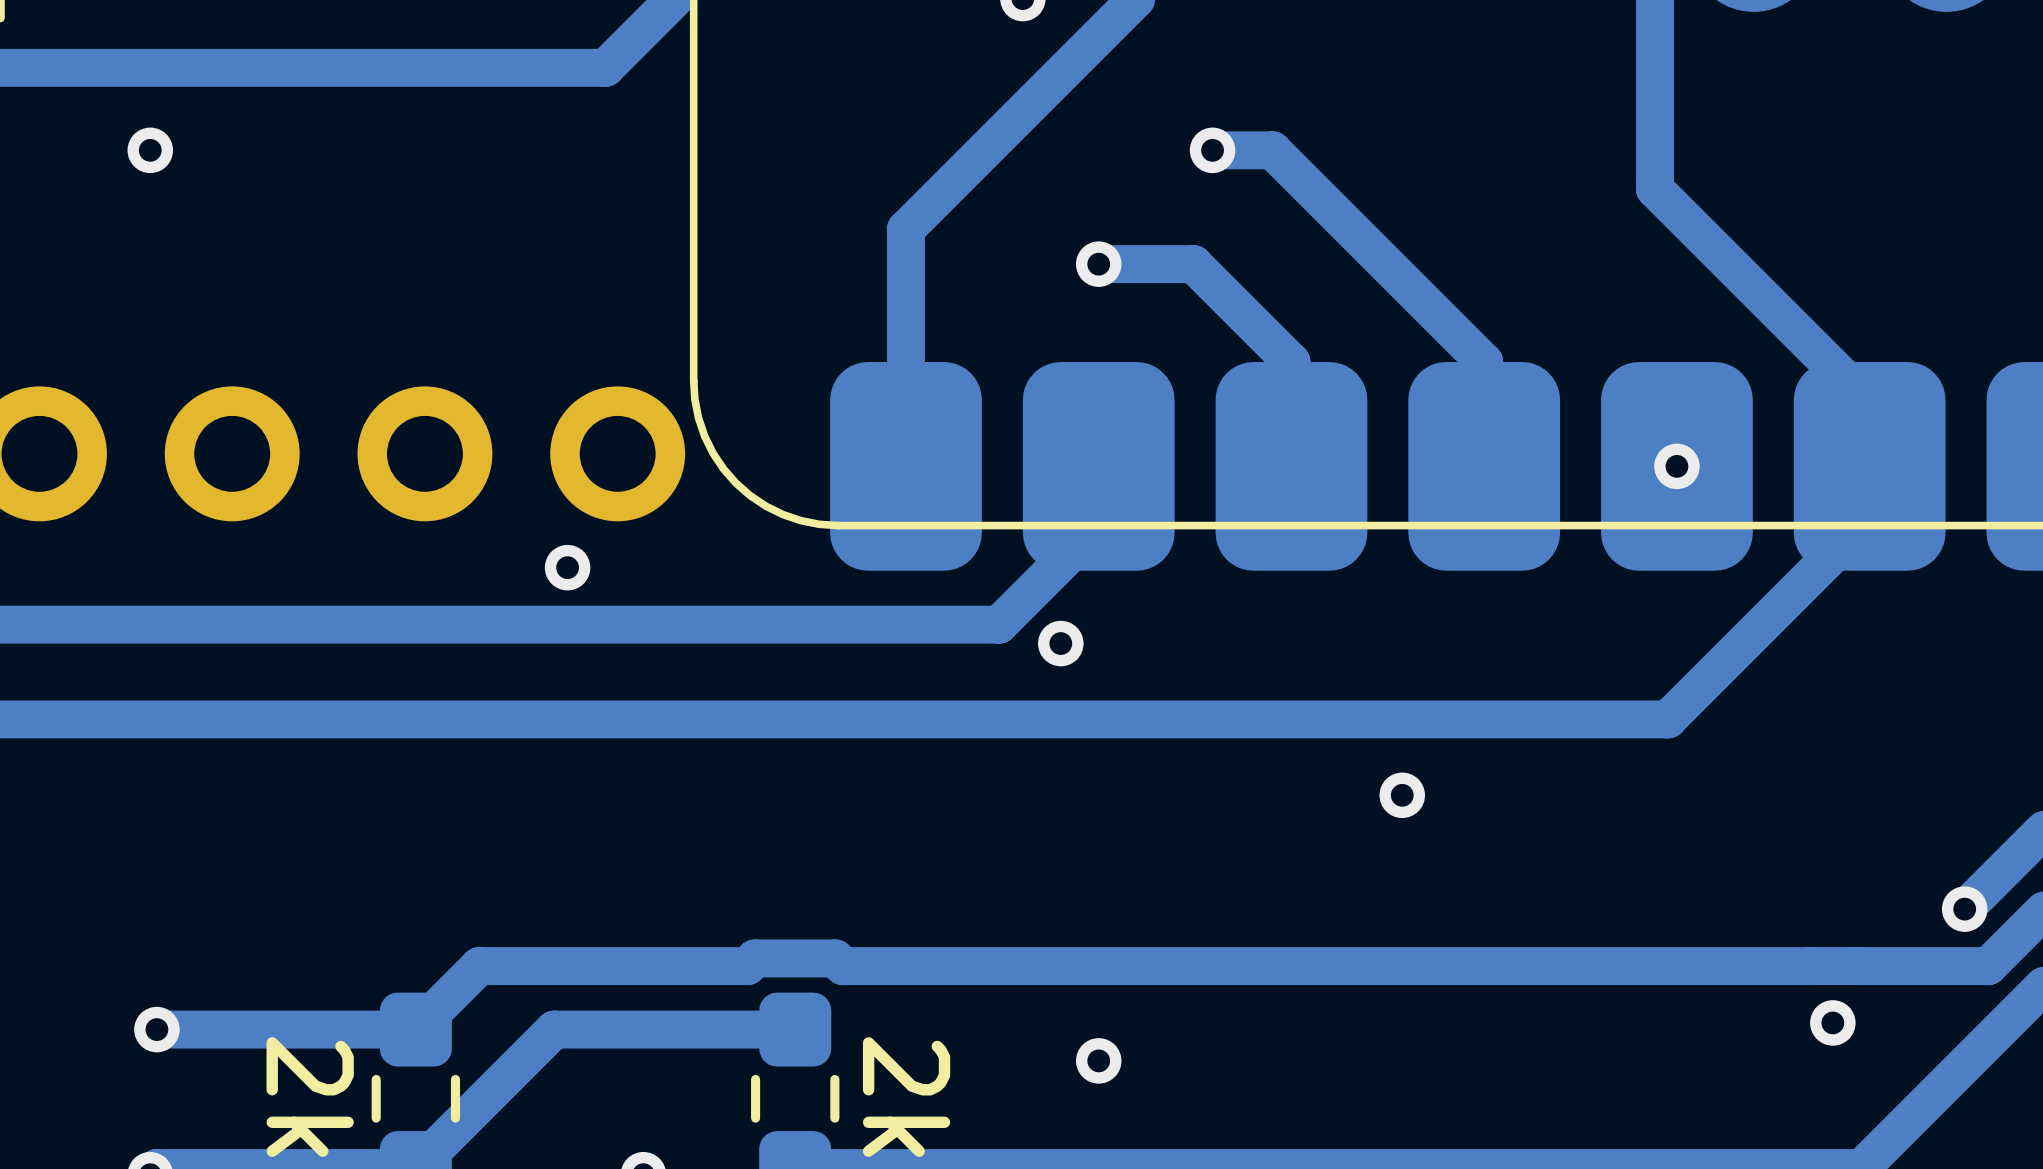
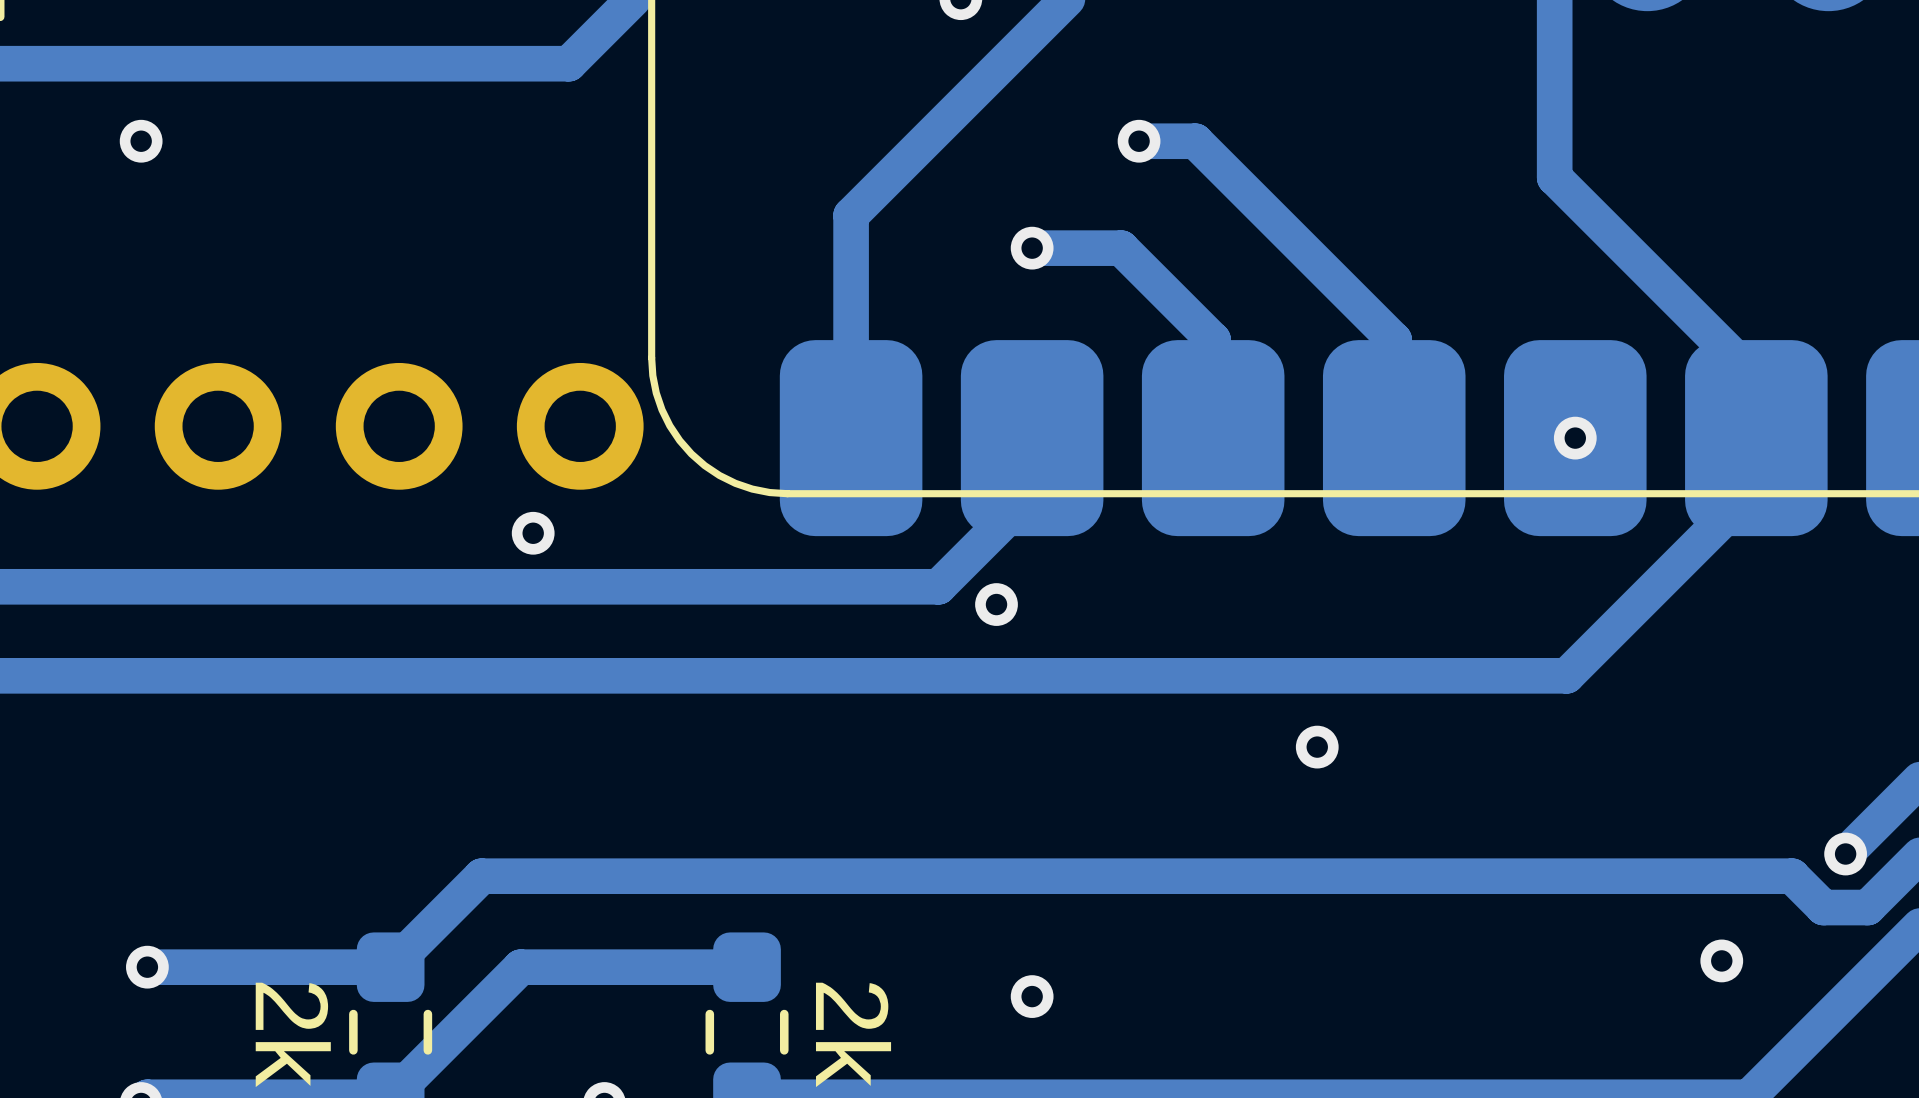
track: (1941, 966) (843, 966) (835, 958) (755, 958) (747, 966) (479, 966) -> (1823, 907) (1792, 876) (481, 876) (450, 907)

